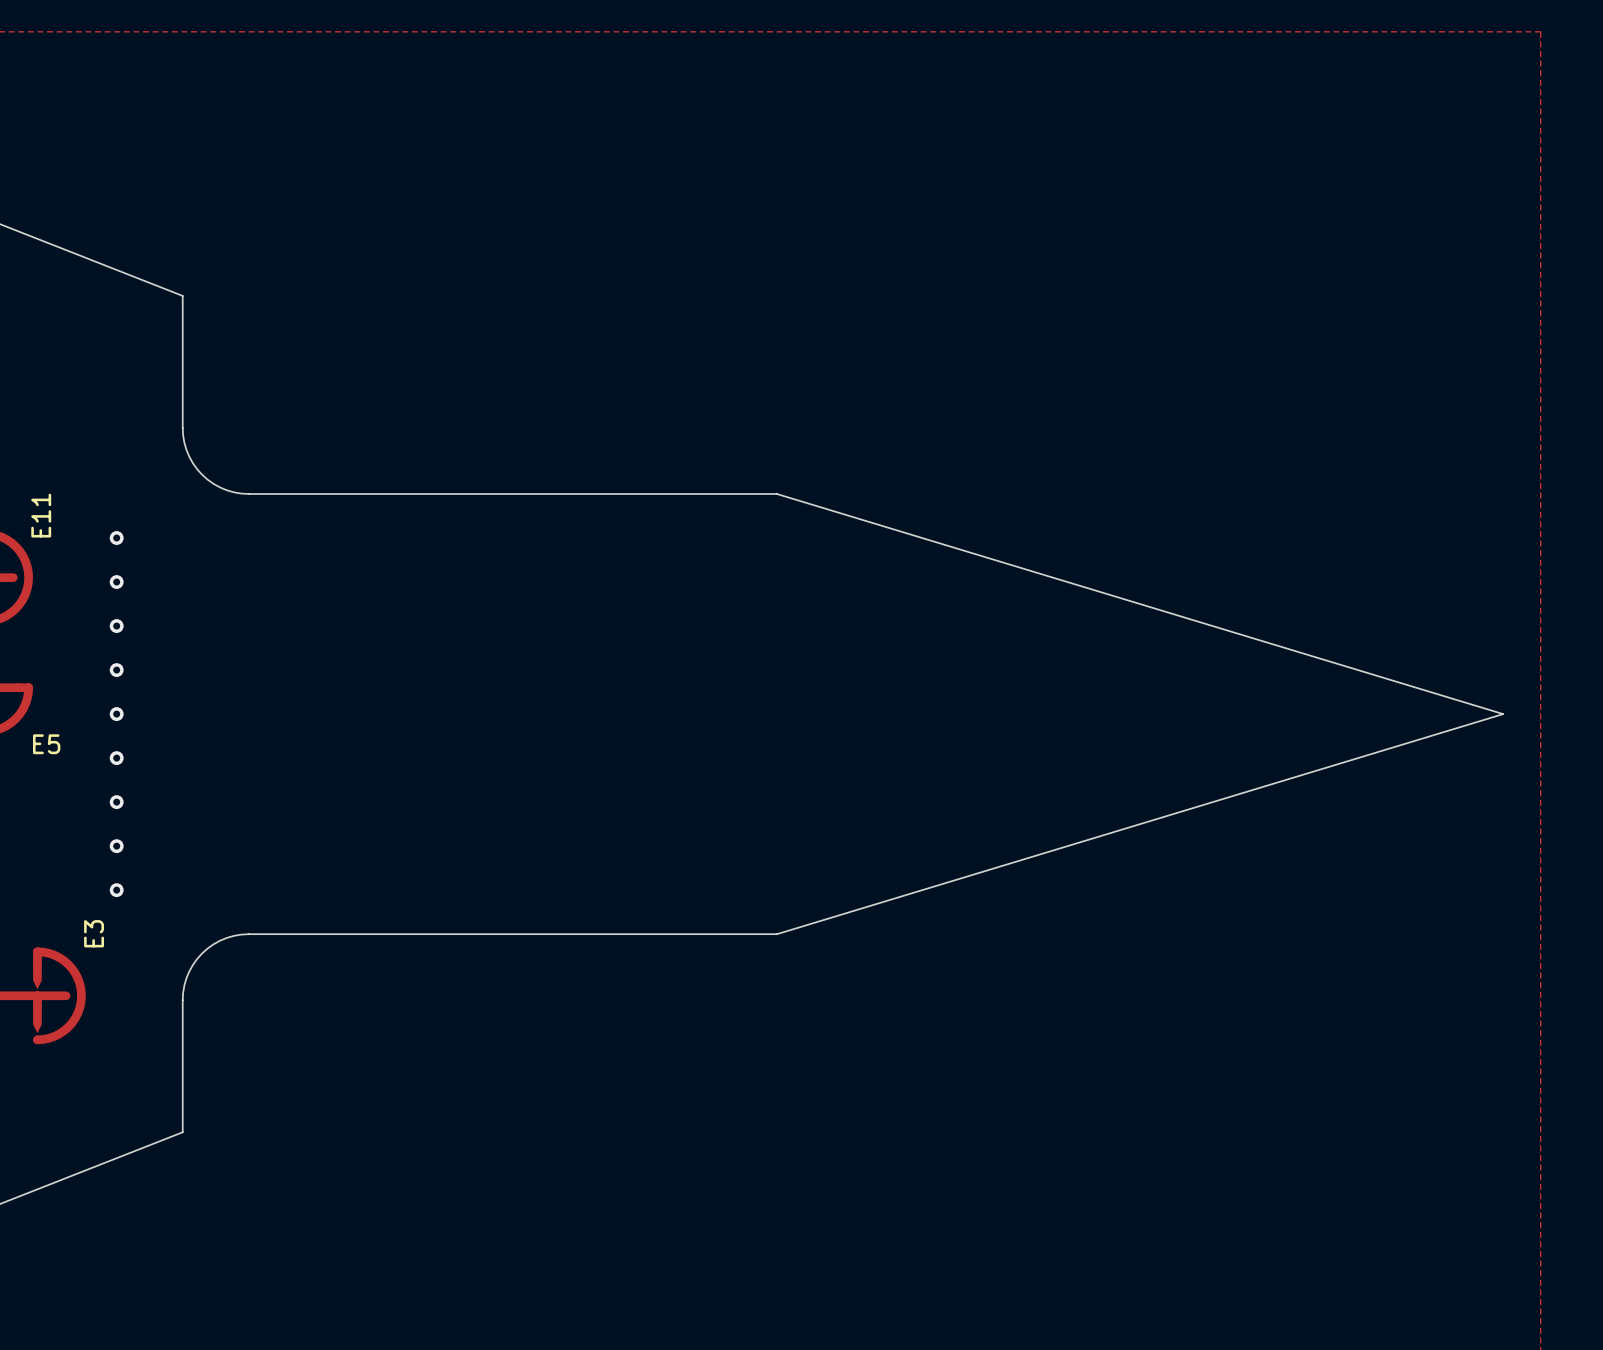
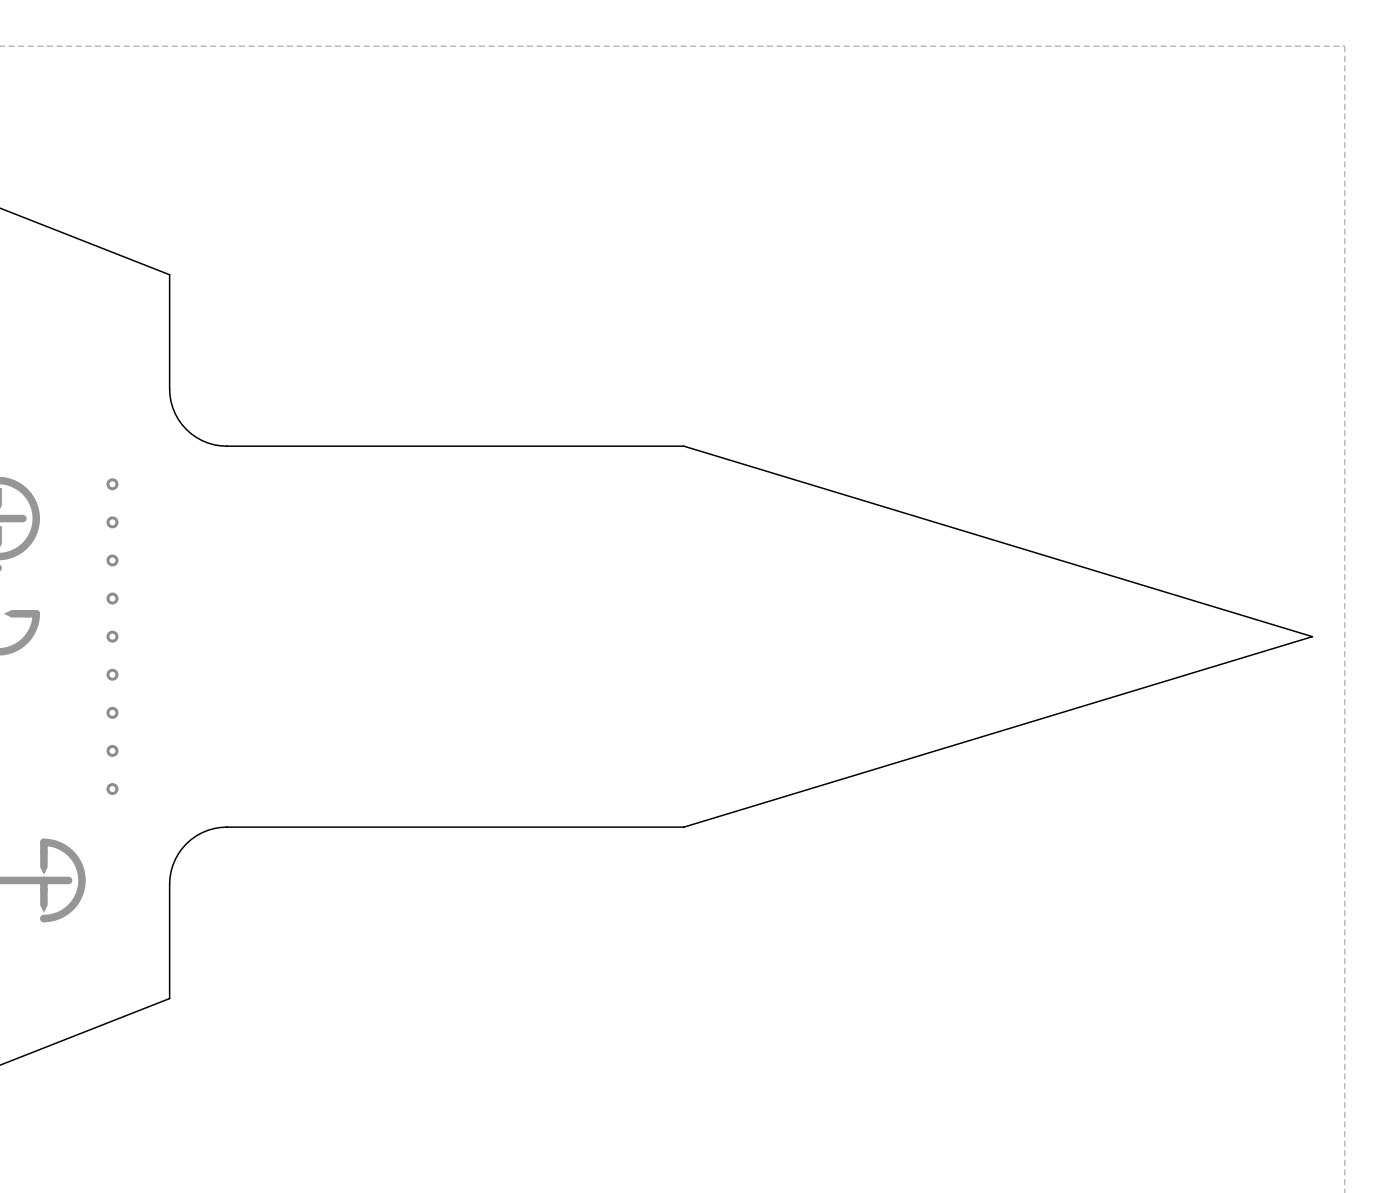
E11 name: E11 (41, 515) -> none
E5 name: E5 (46, 744) -> none
E3 name: E3 (94, 933) -> none

